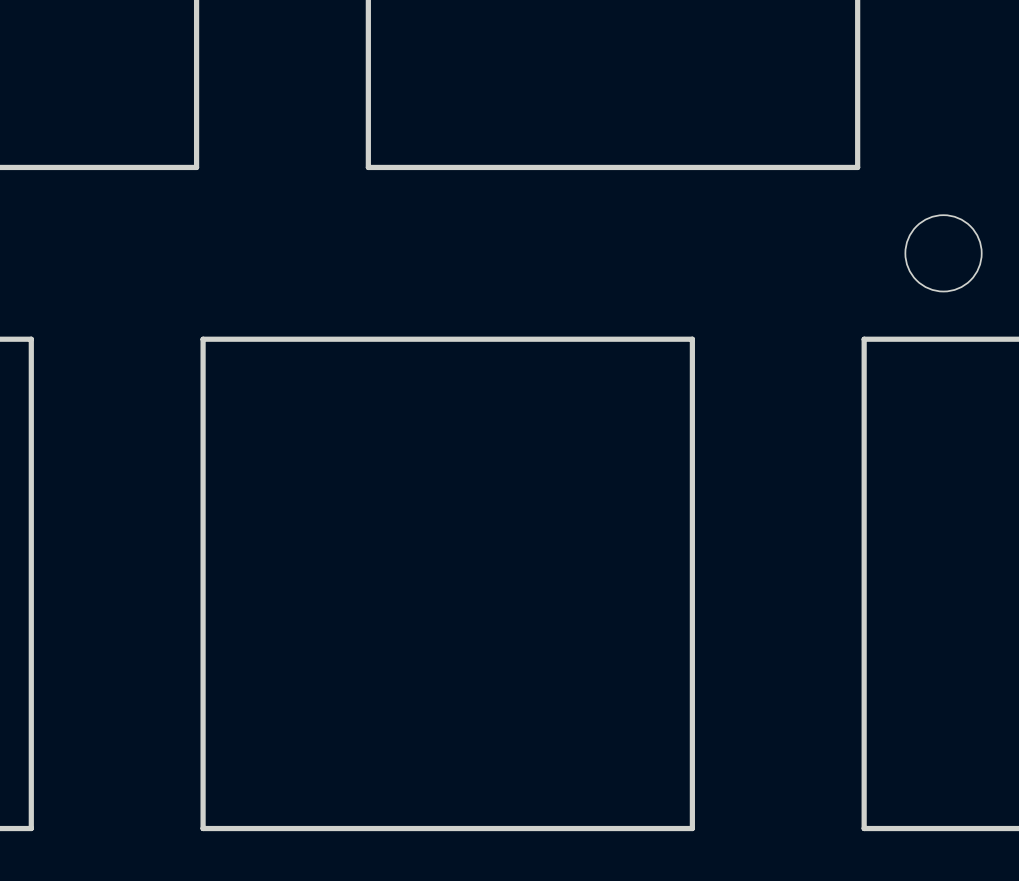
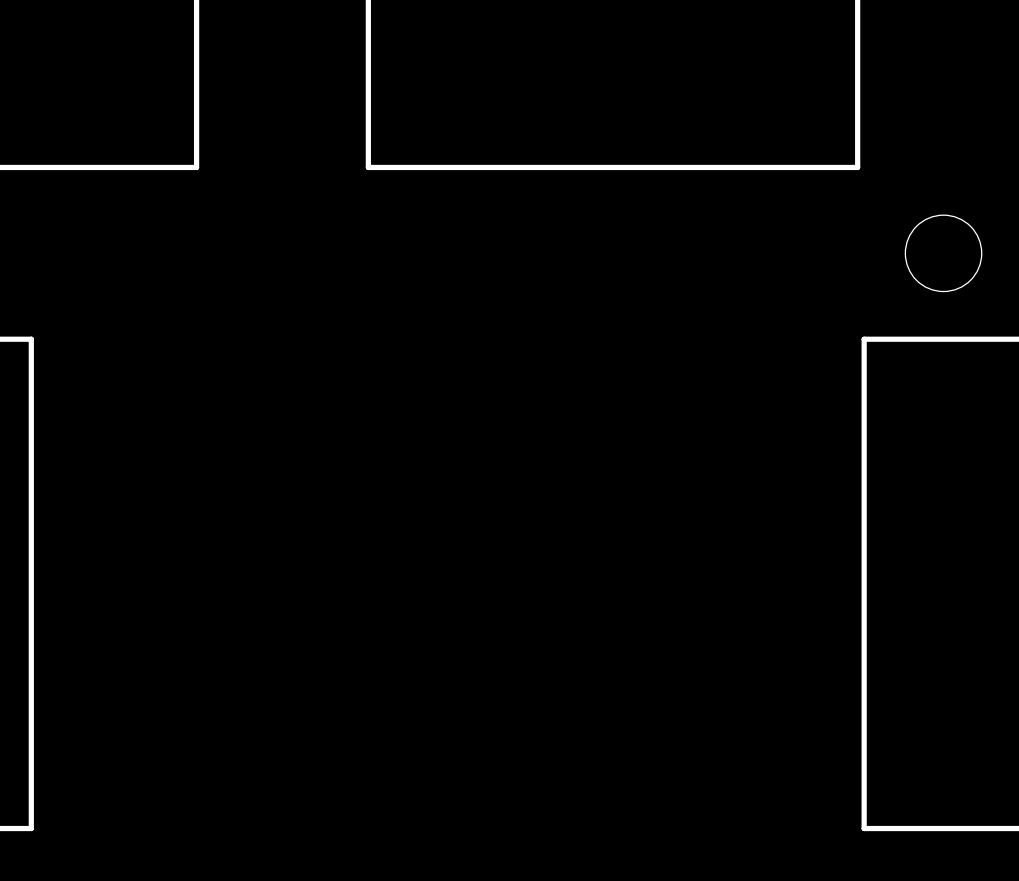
drawing: [200, 336, 695, 832] -> none

